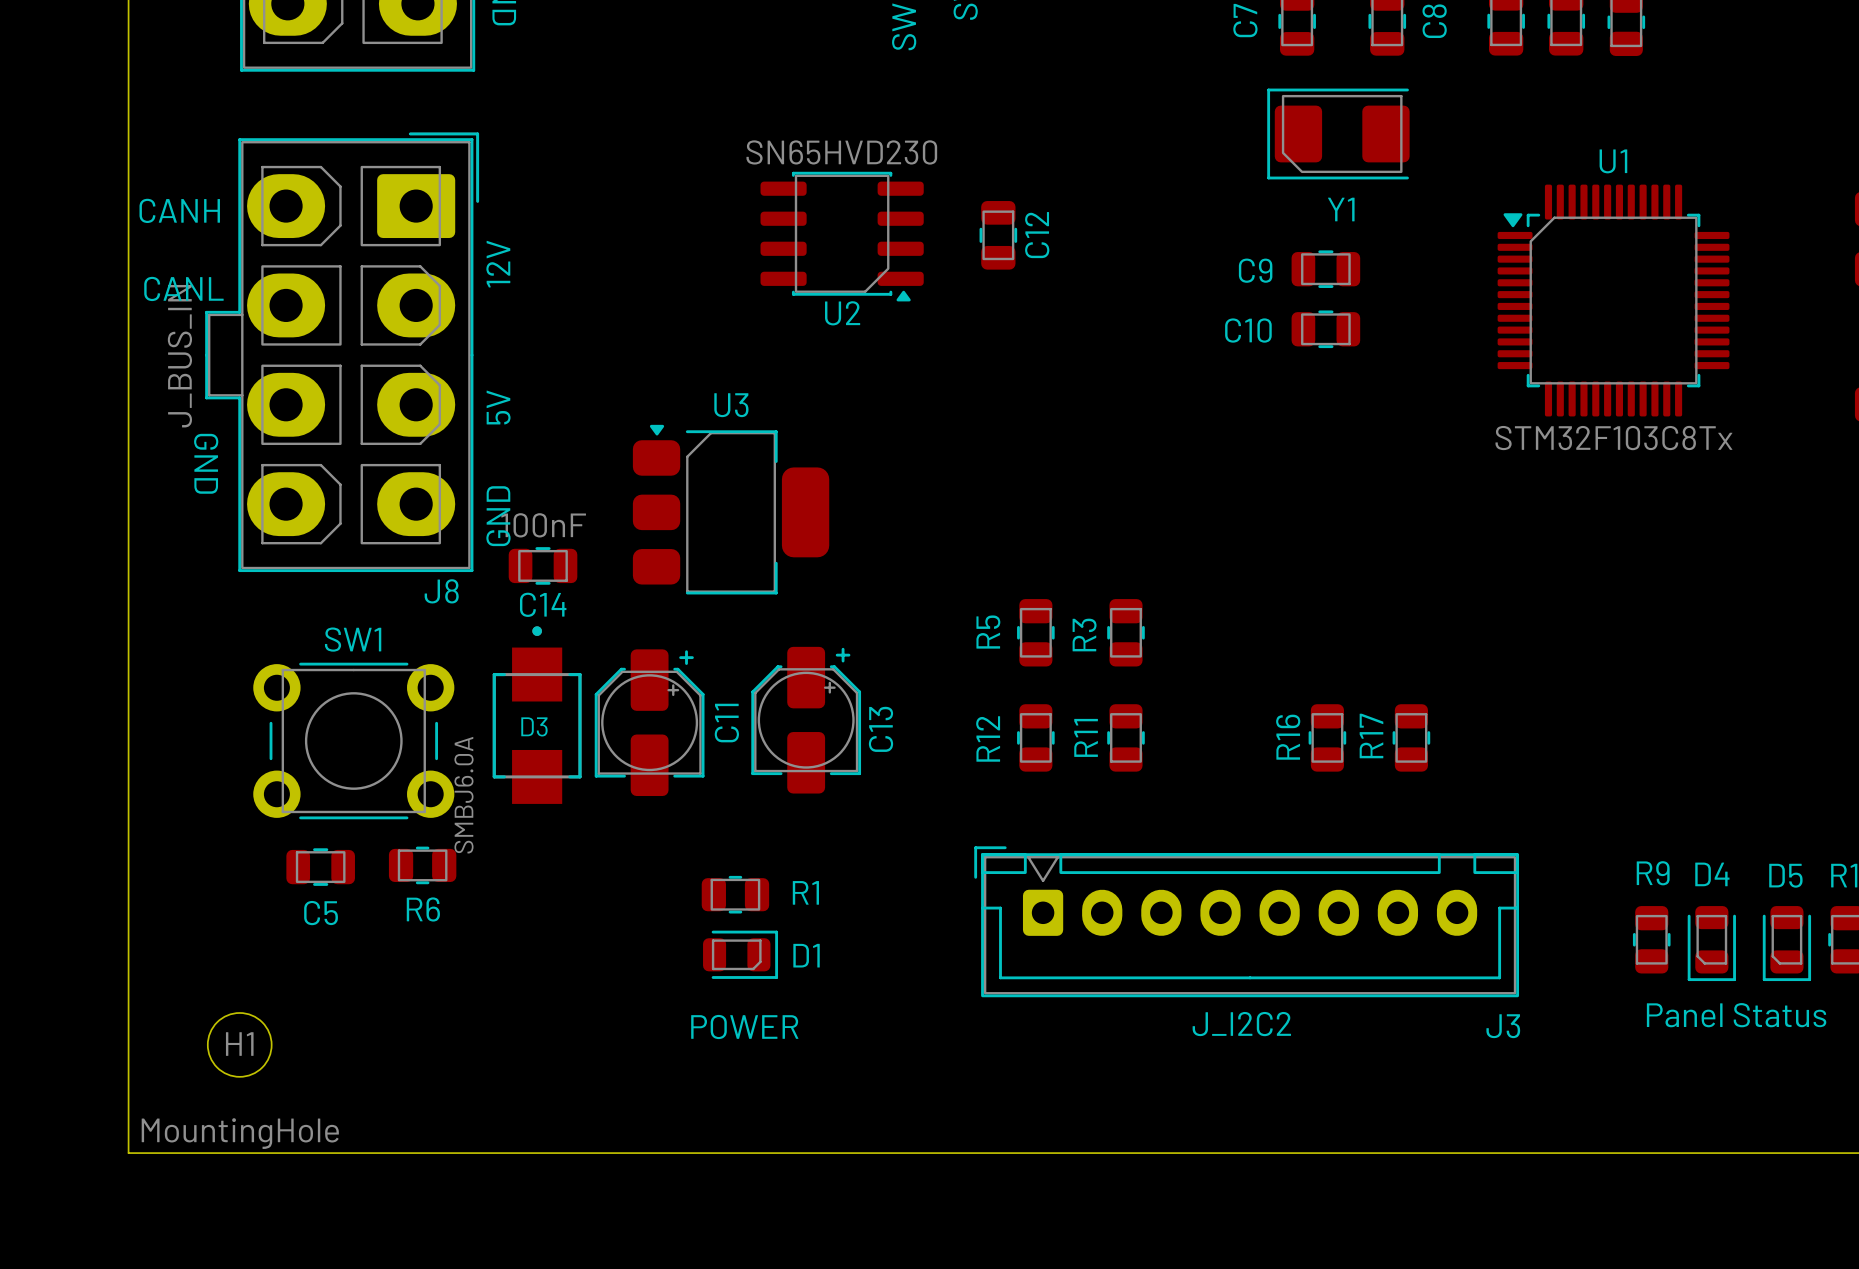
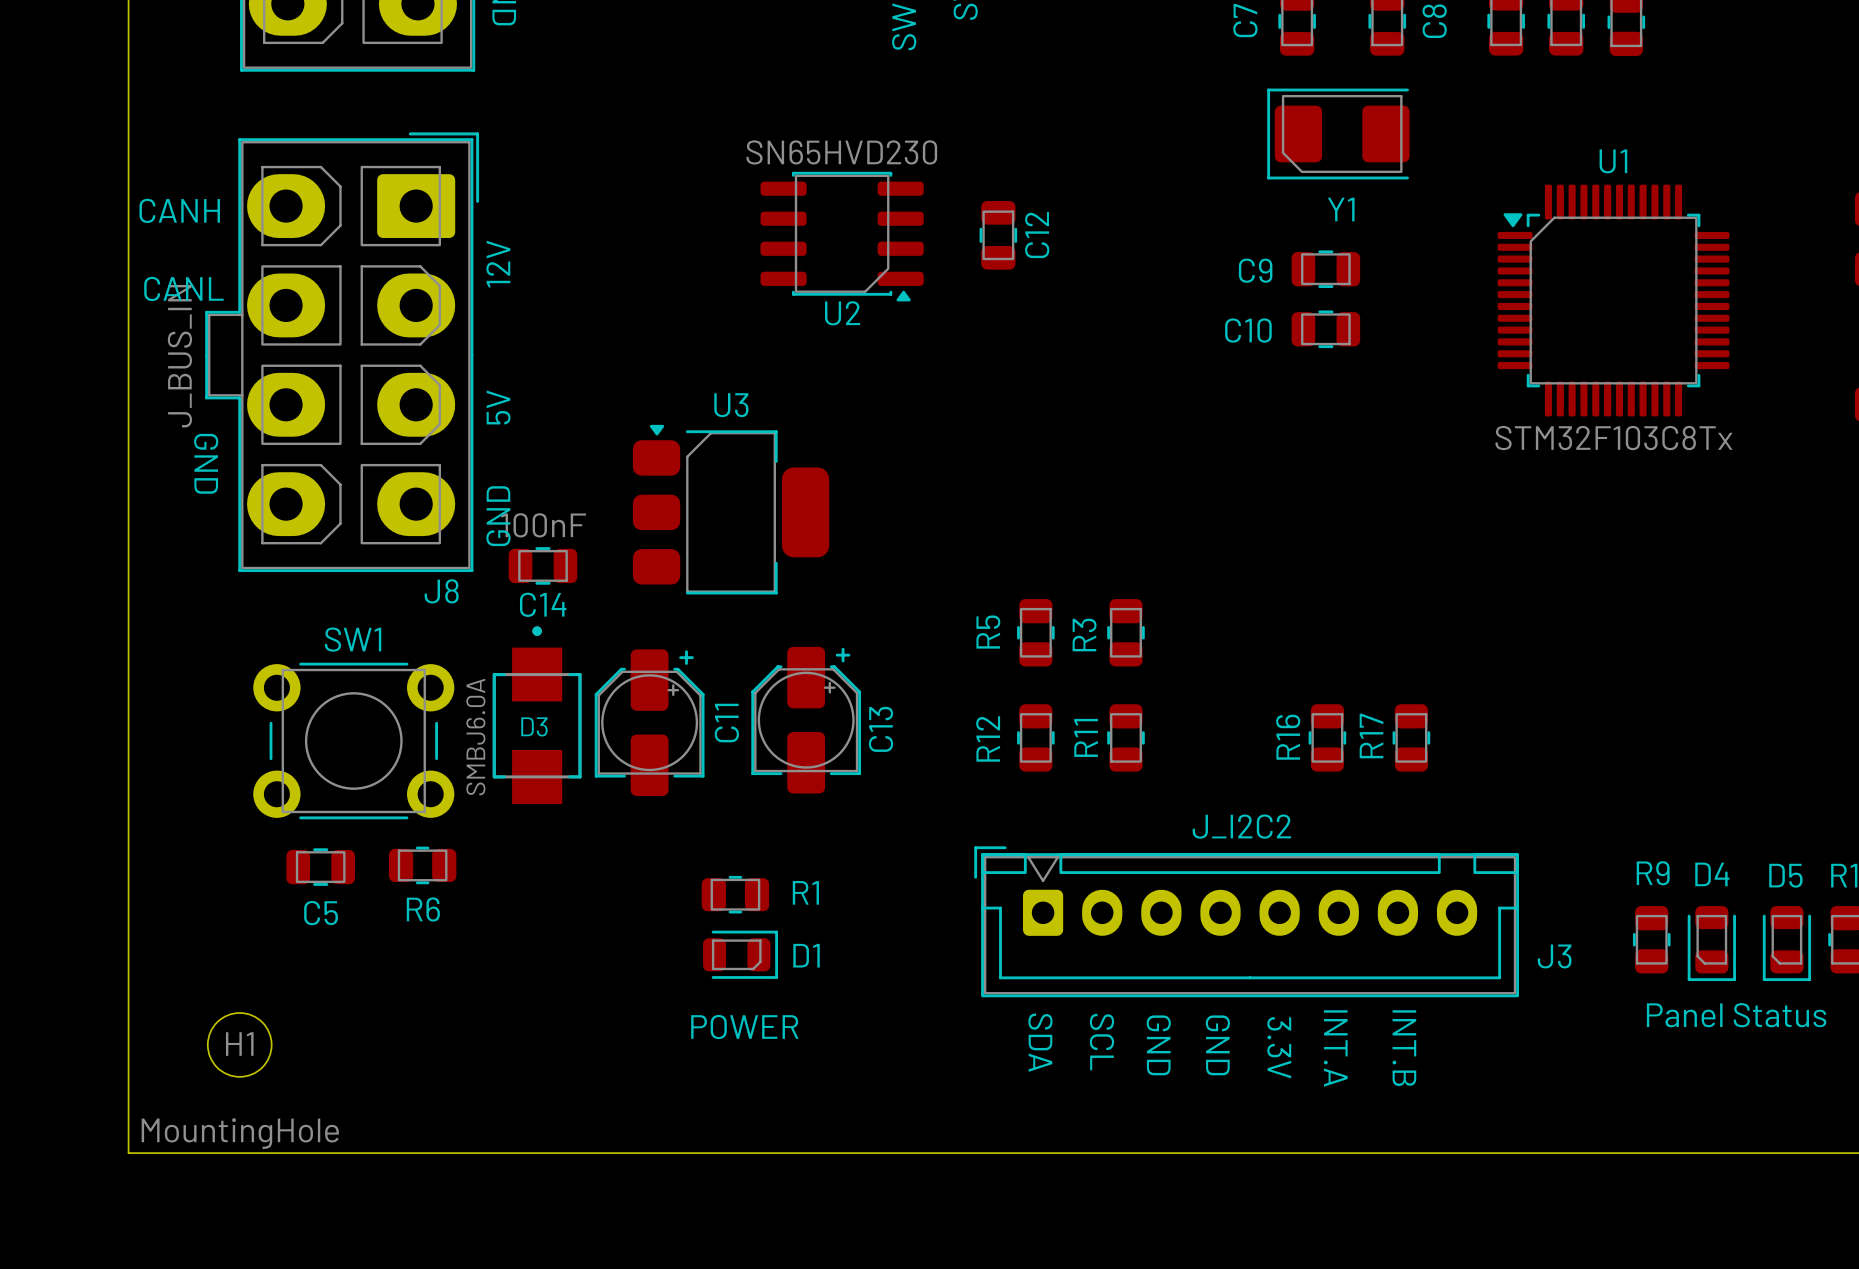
D3 value position: SMBJ6.0A (464, 795) -> SMBJ6.0A (475, 736)
text position: J_I2C2 (1241, 1024) -> J_I2C2 (1241, 826)
J3 name position: J3 (1503, 1026) -> J3 (1554, 956)
text: none -> SDA (1040, 1042)
text: none -> SCL (1101, 1042)
text: none -> GND (1158, 1045)
text: none -> GND (1217, 1045)
text: none -> 3.3V (1279, 1047)
text: none -> INT.A (1335, 1048)
text: none -> INT.B (1404, 1048)

